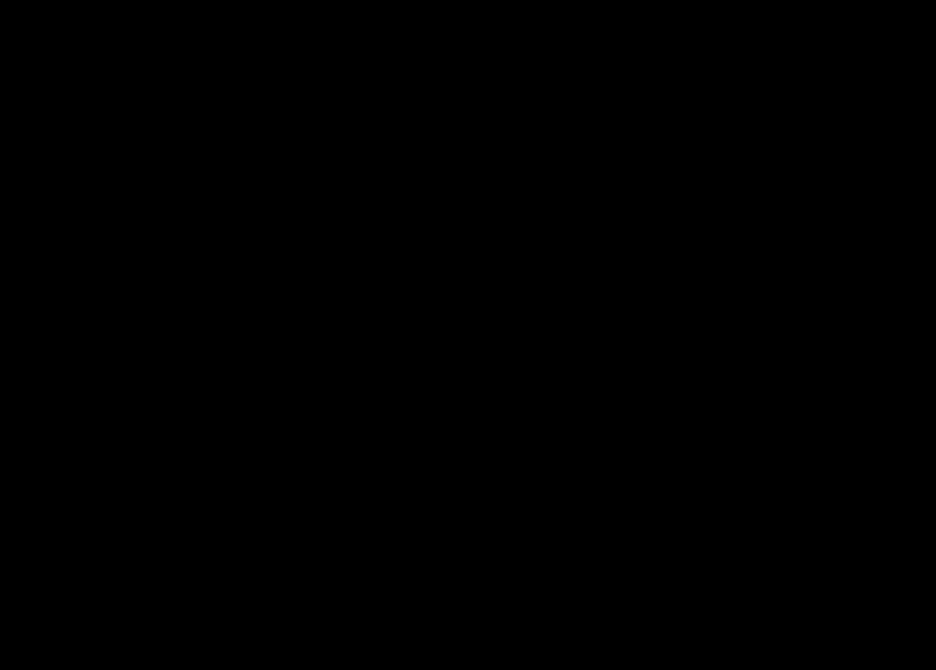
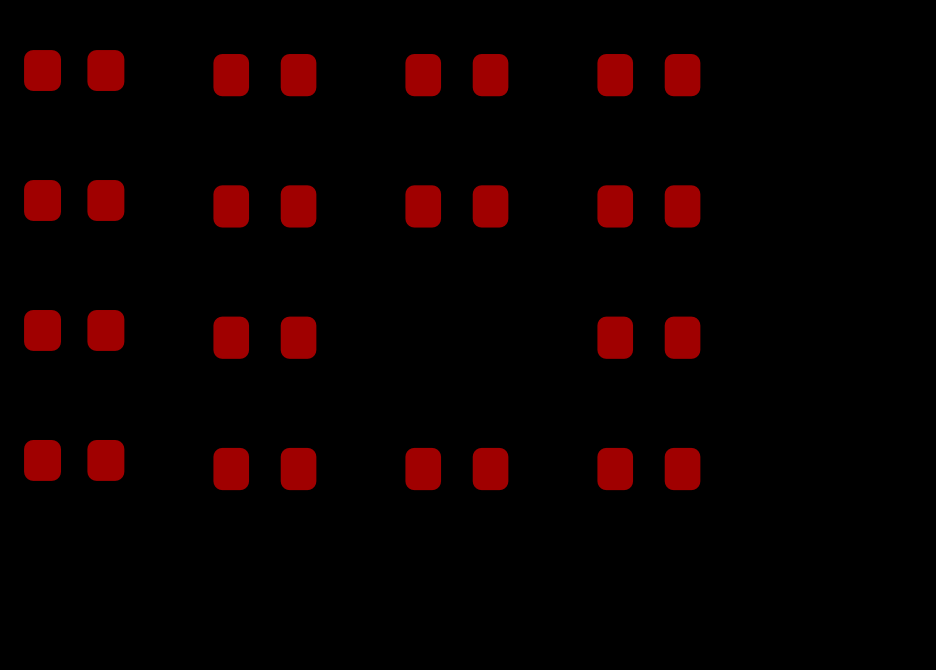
part: none -> (74, 70)
part: none -> (264, 75)
part: none -> (456, 75)
part: none -> (648, 75)
part: none -> (74, 200)
part: none -> (264, 206)
part: none -> (456, 206)
part: none -> (648, 206)
part: none -> (74, 330)
part: none -> (264, 337)
part: none -> (648, 337)
part: none -> (74, 460)
part: none -> (264, 469)
part: none -> (456, 469)
part: none -> (648, 469)

